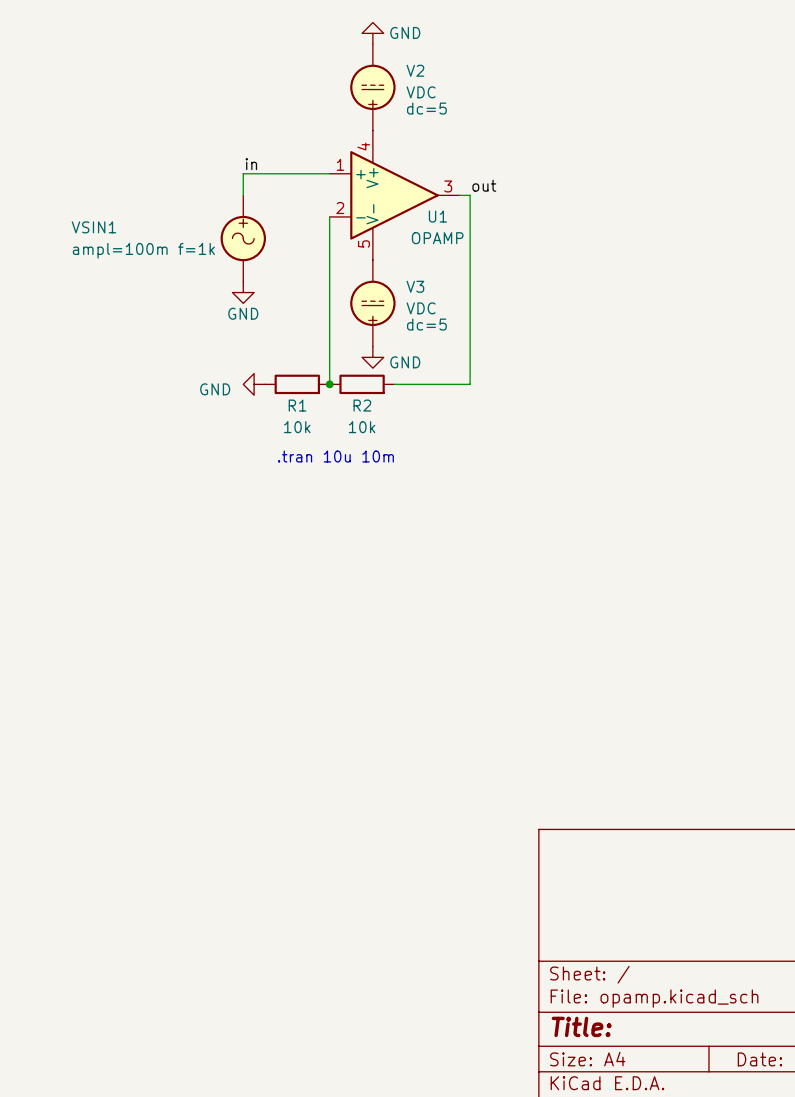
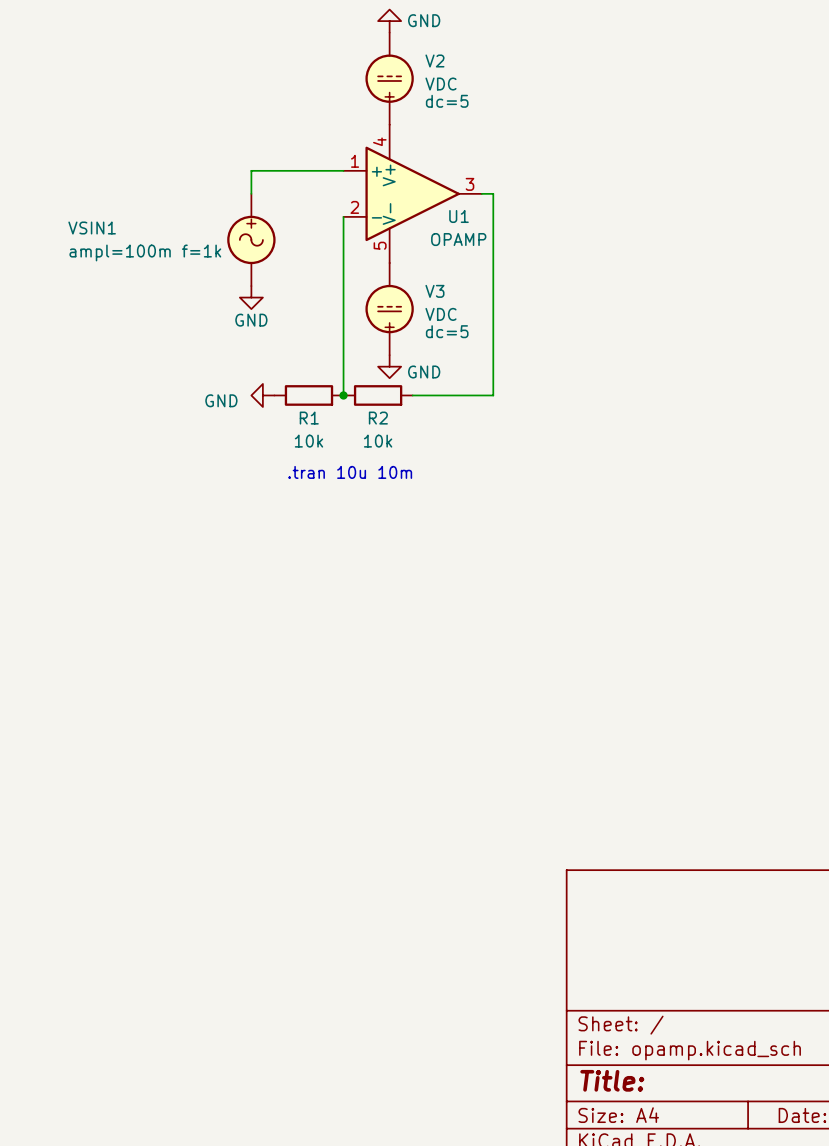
label: in (251, 164) -> none
label: out (484, 185) -> none

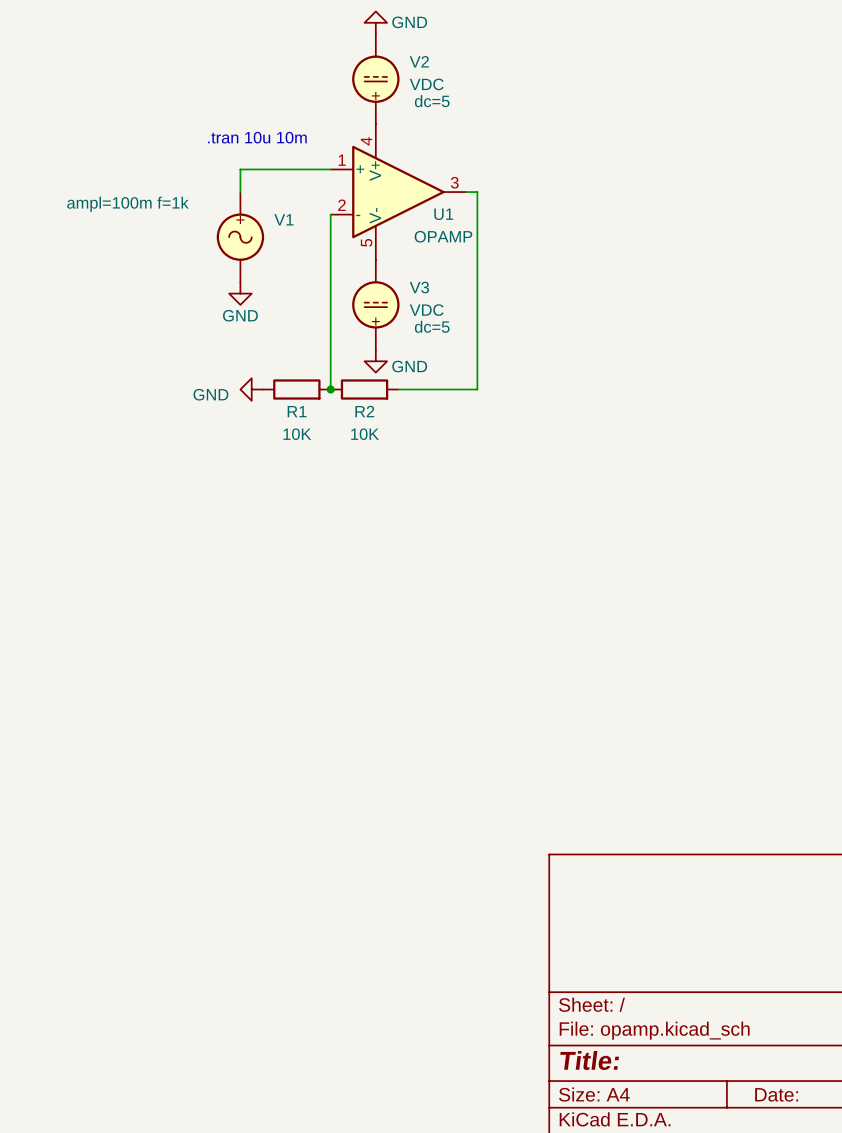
text: none -> .tran 10u 10m (257, 137)
VSIN1 text: none -> ampl=100m f=1k (127, 204)
VSIN1 name: VSIN1 (92, 228) -> V1 (283, 219)
VSIN1 value: ampl=100m f=1k (145, 252) -> none
R1 value: 10k (308, 441) -> 10K (297, 434)
R2 value: 10k (378, 441) -> 10K (365, 434)
text: .tran 10u 10m (350, 472) -> none

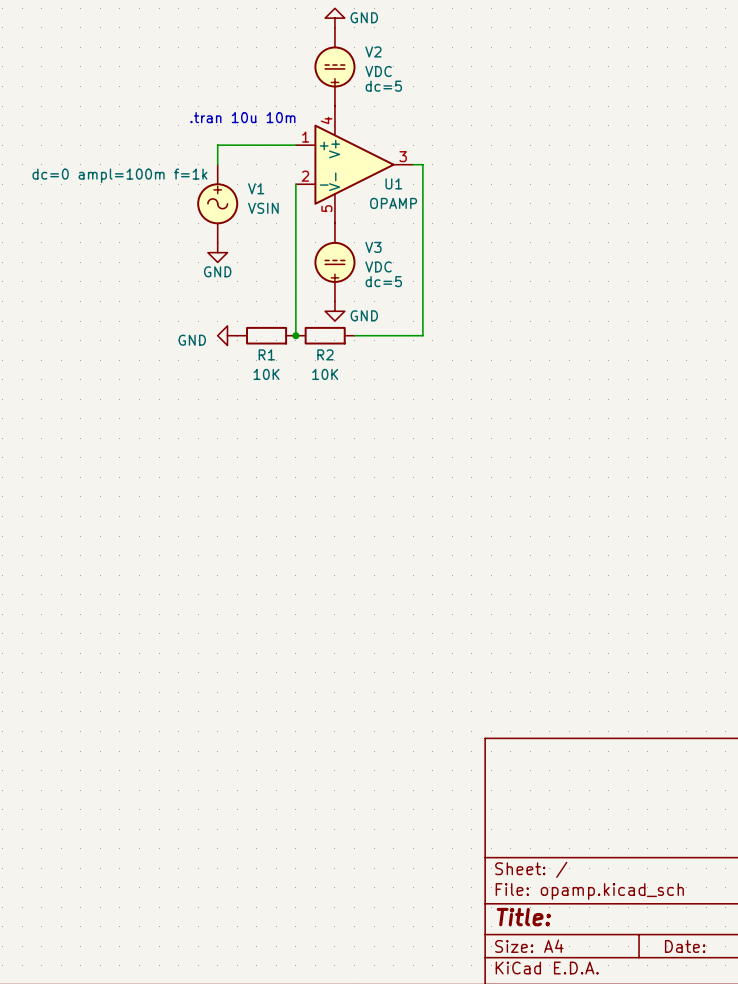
V1 text: ampl=100m f=1k (127, 204) -> dc=0 ampl=100m f=1k (119, 175)
V1 value: none -> VSIN (263, 208)

